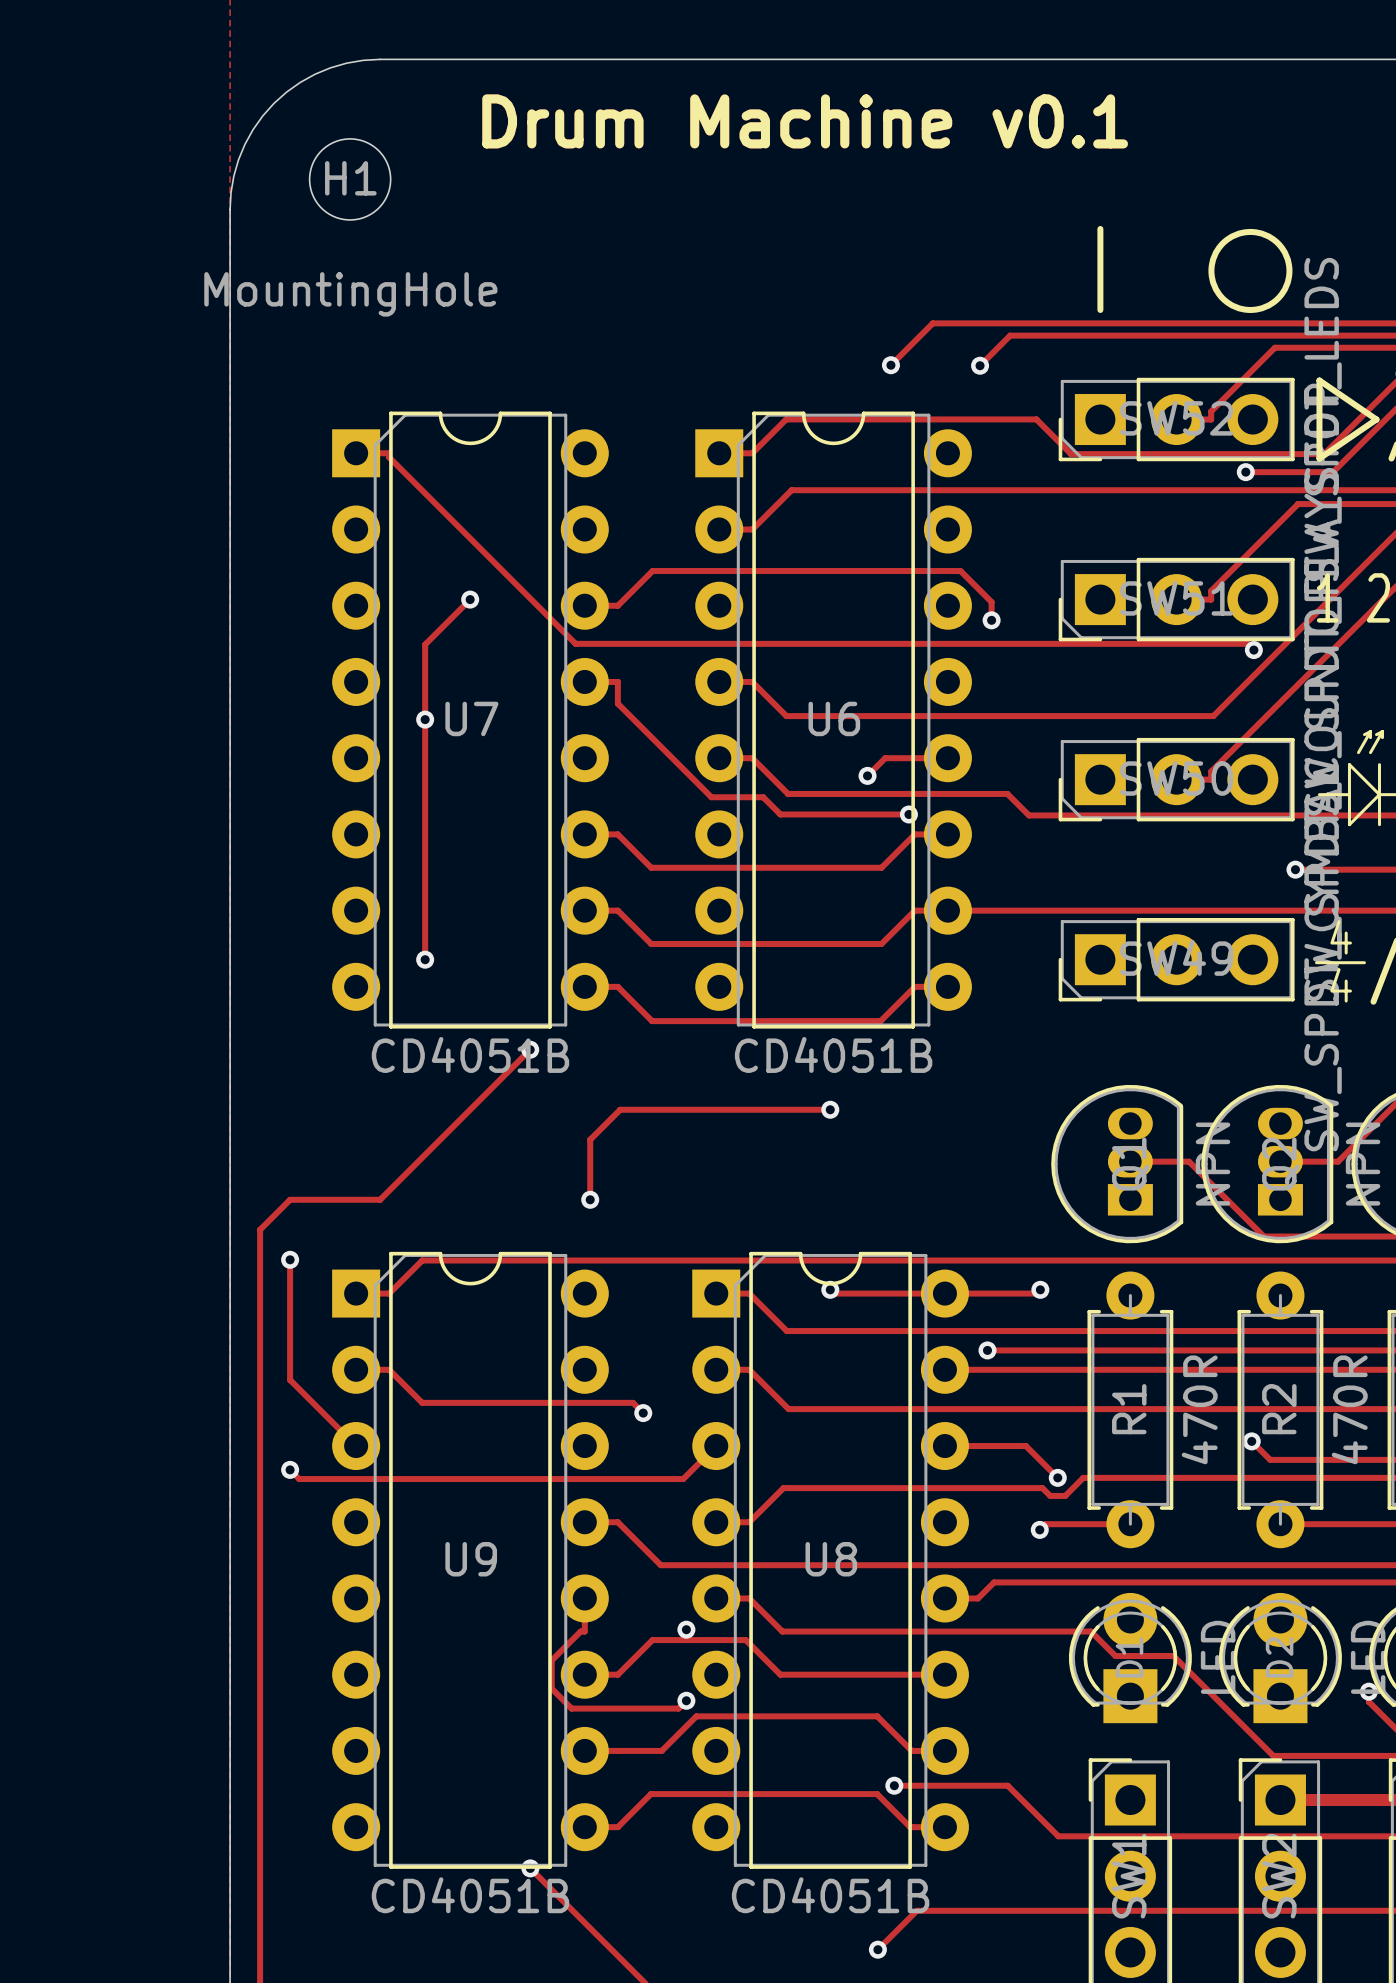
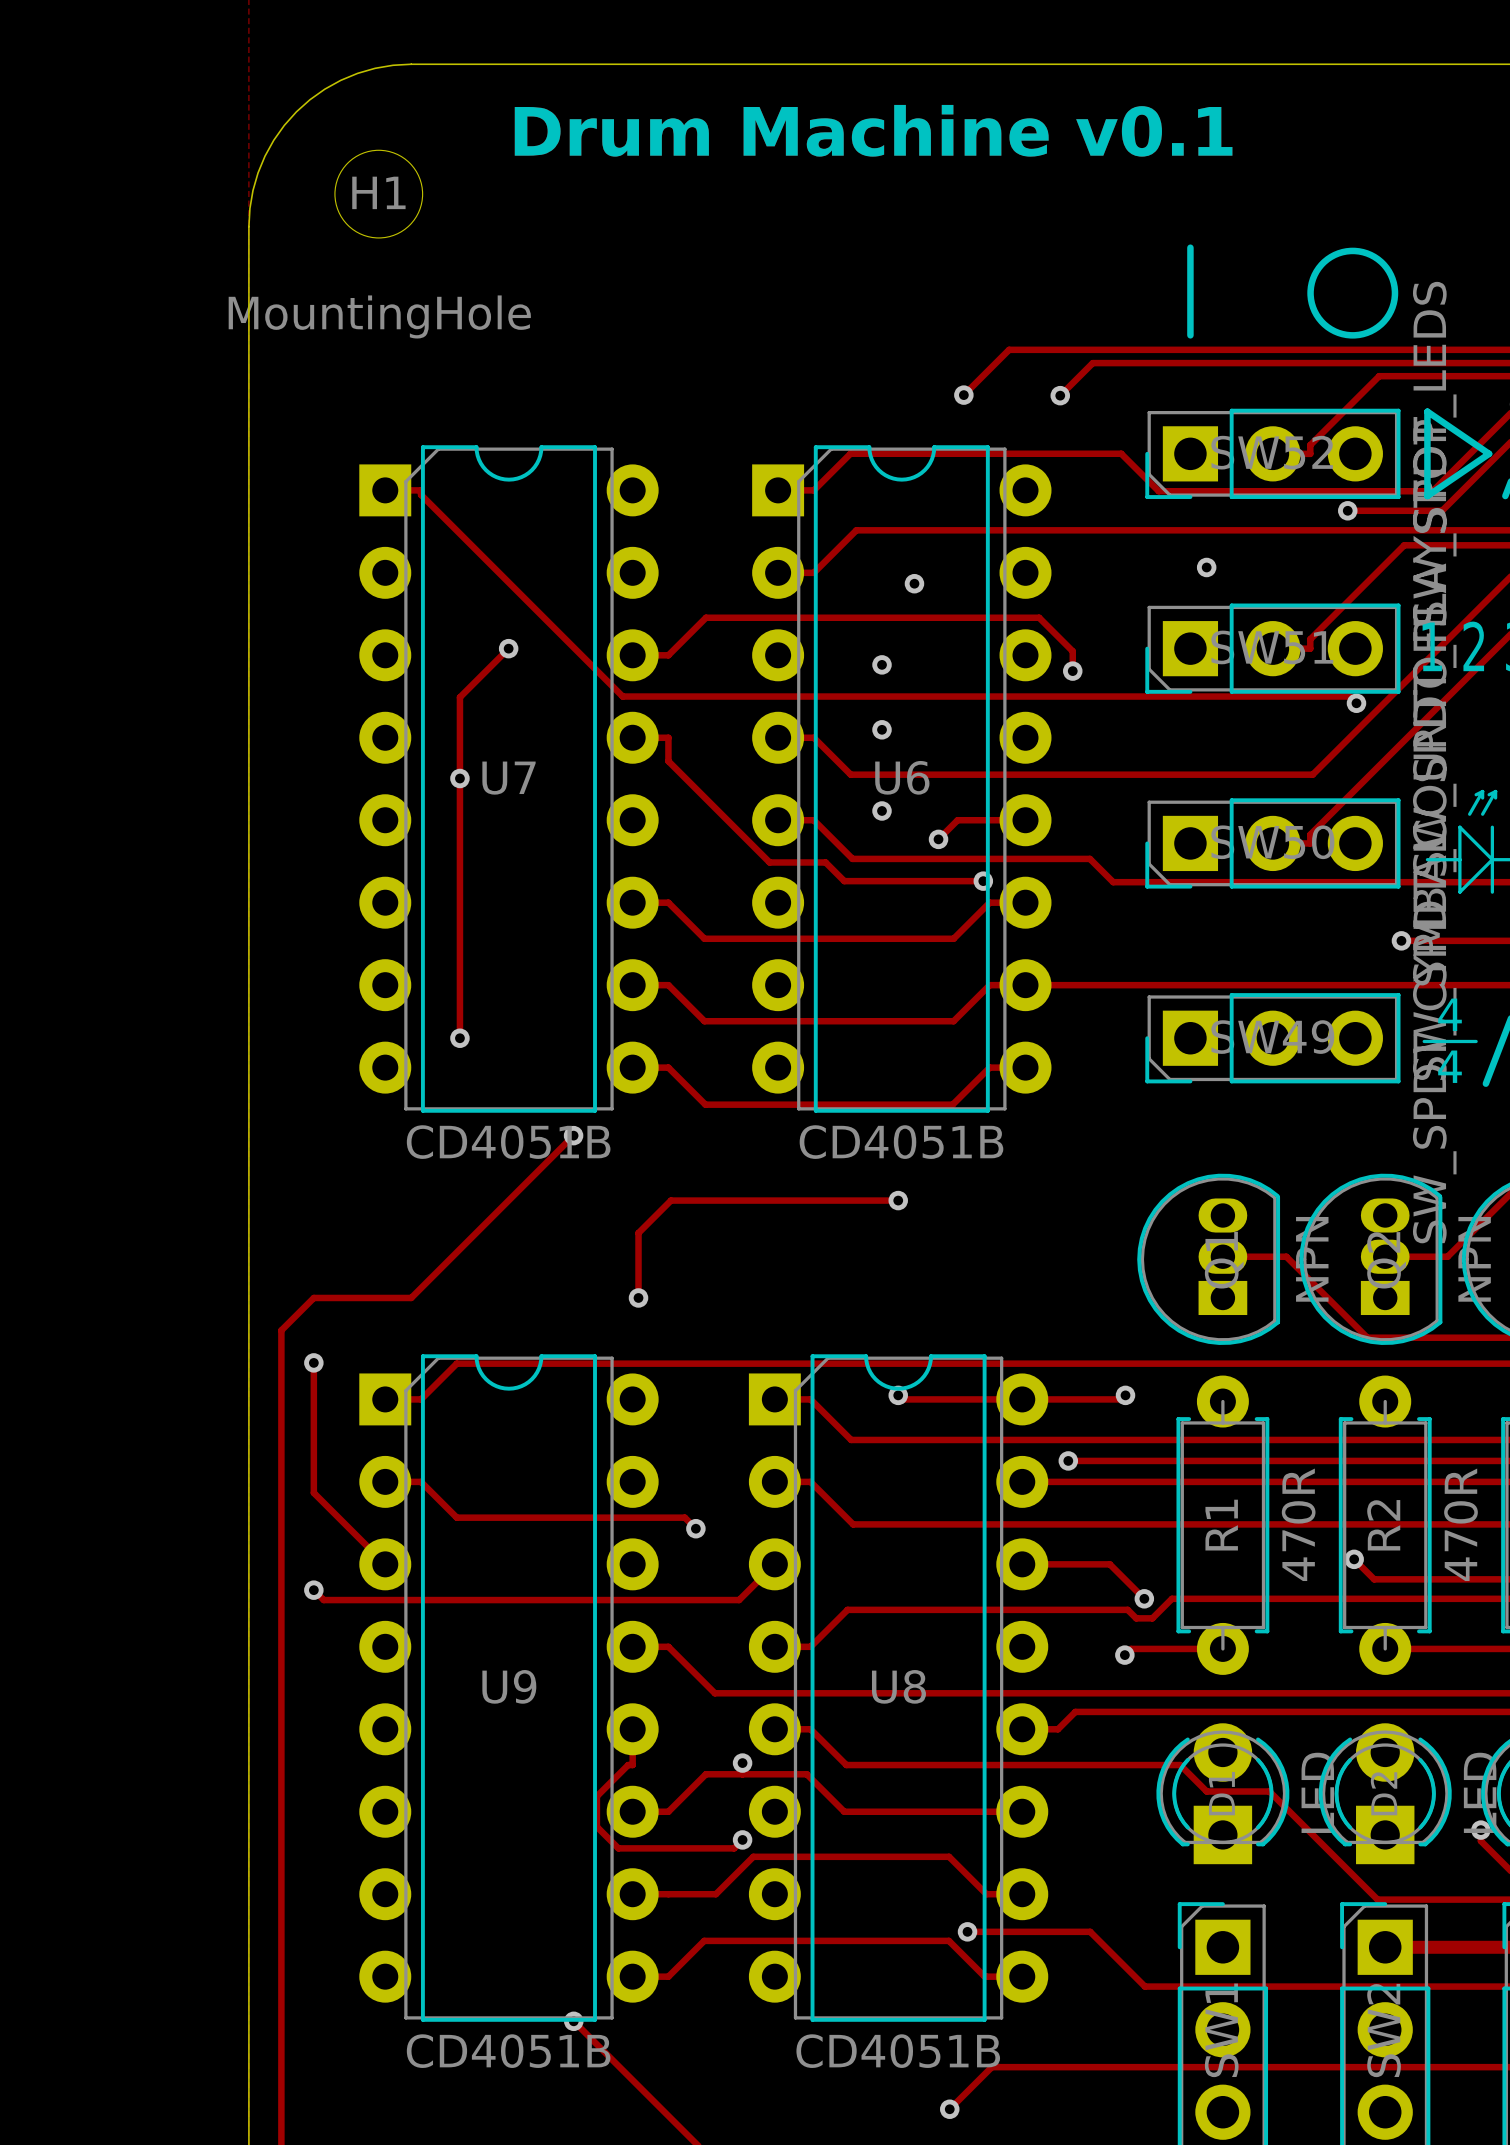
via: none -> (1206, 567)
via: none -> (914, 583)
via: none -> (882, 664)
via: none -> (882, 729)
via: none -> (882, 810)

